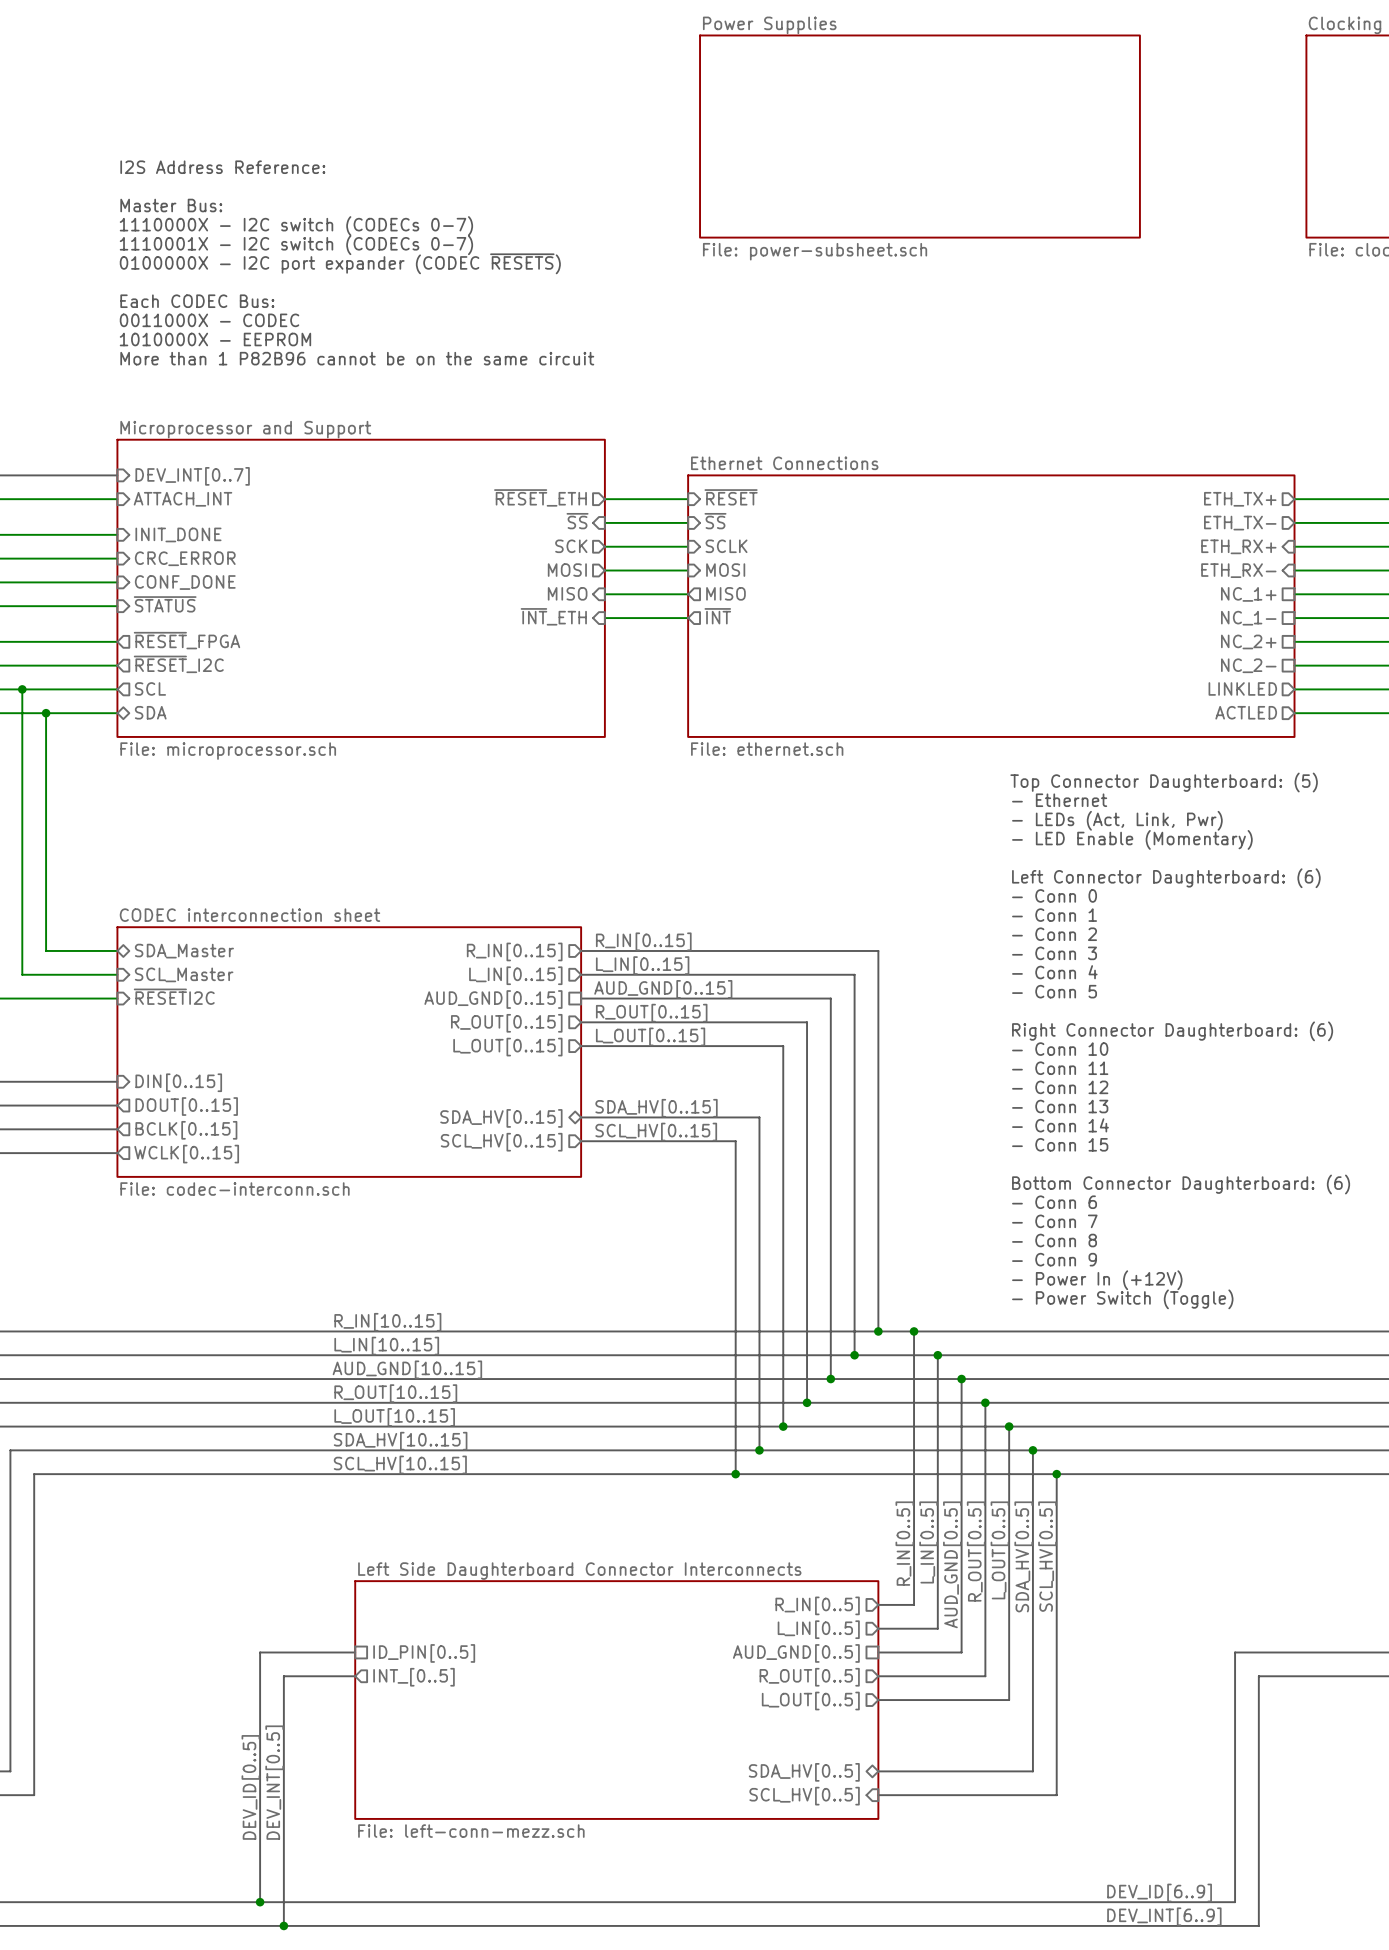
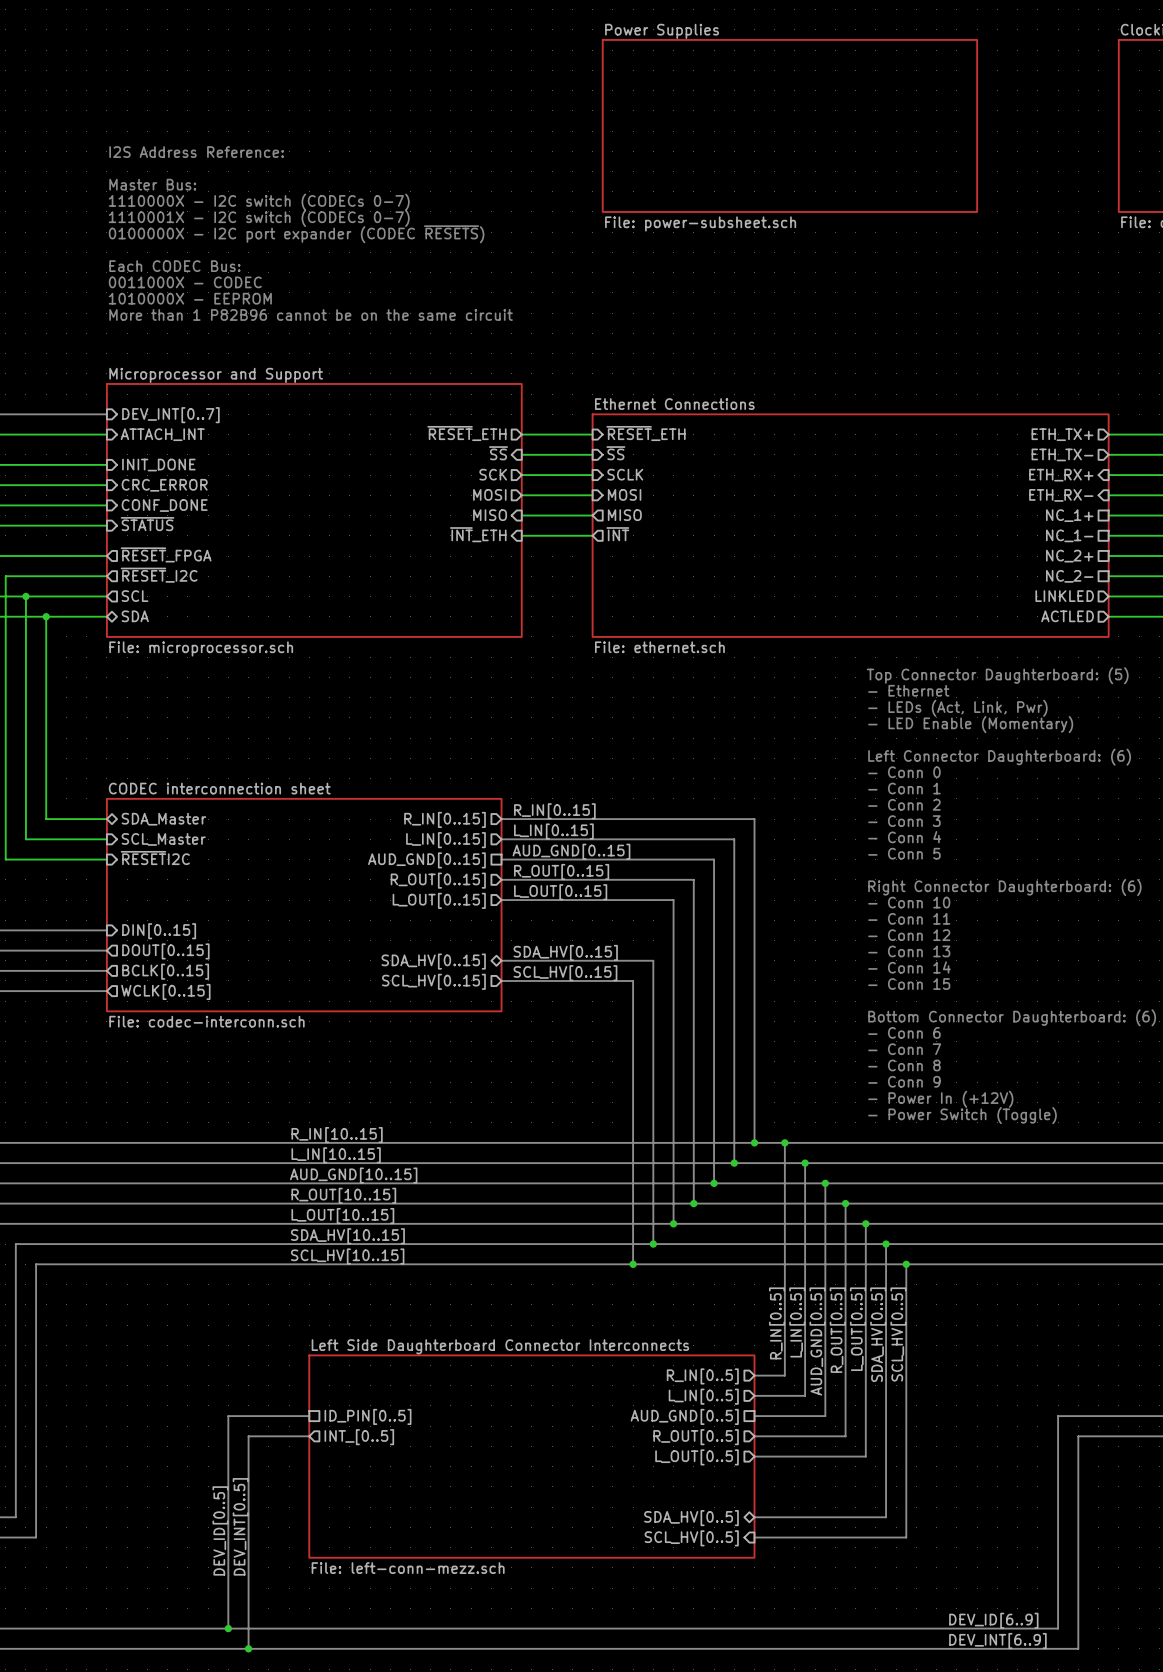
sheet pin: ~{RESET} (731, 497) -> ~{RESET}_ETH (646, 433)

